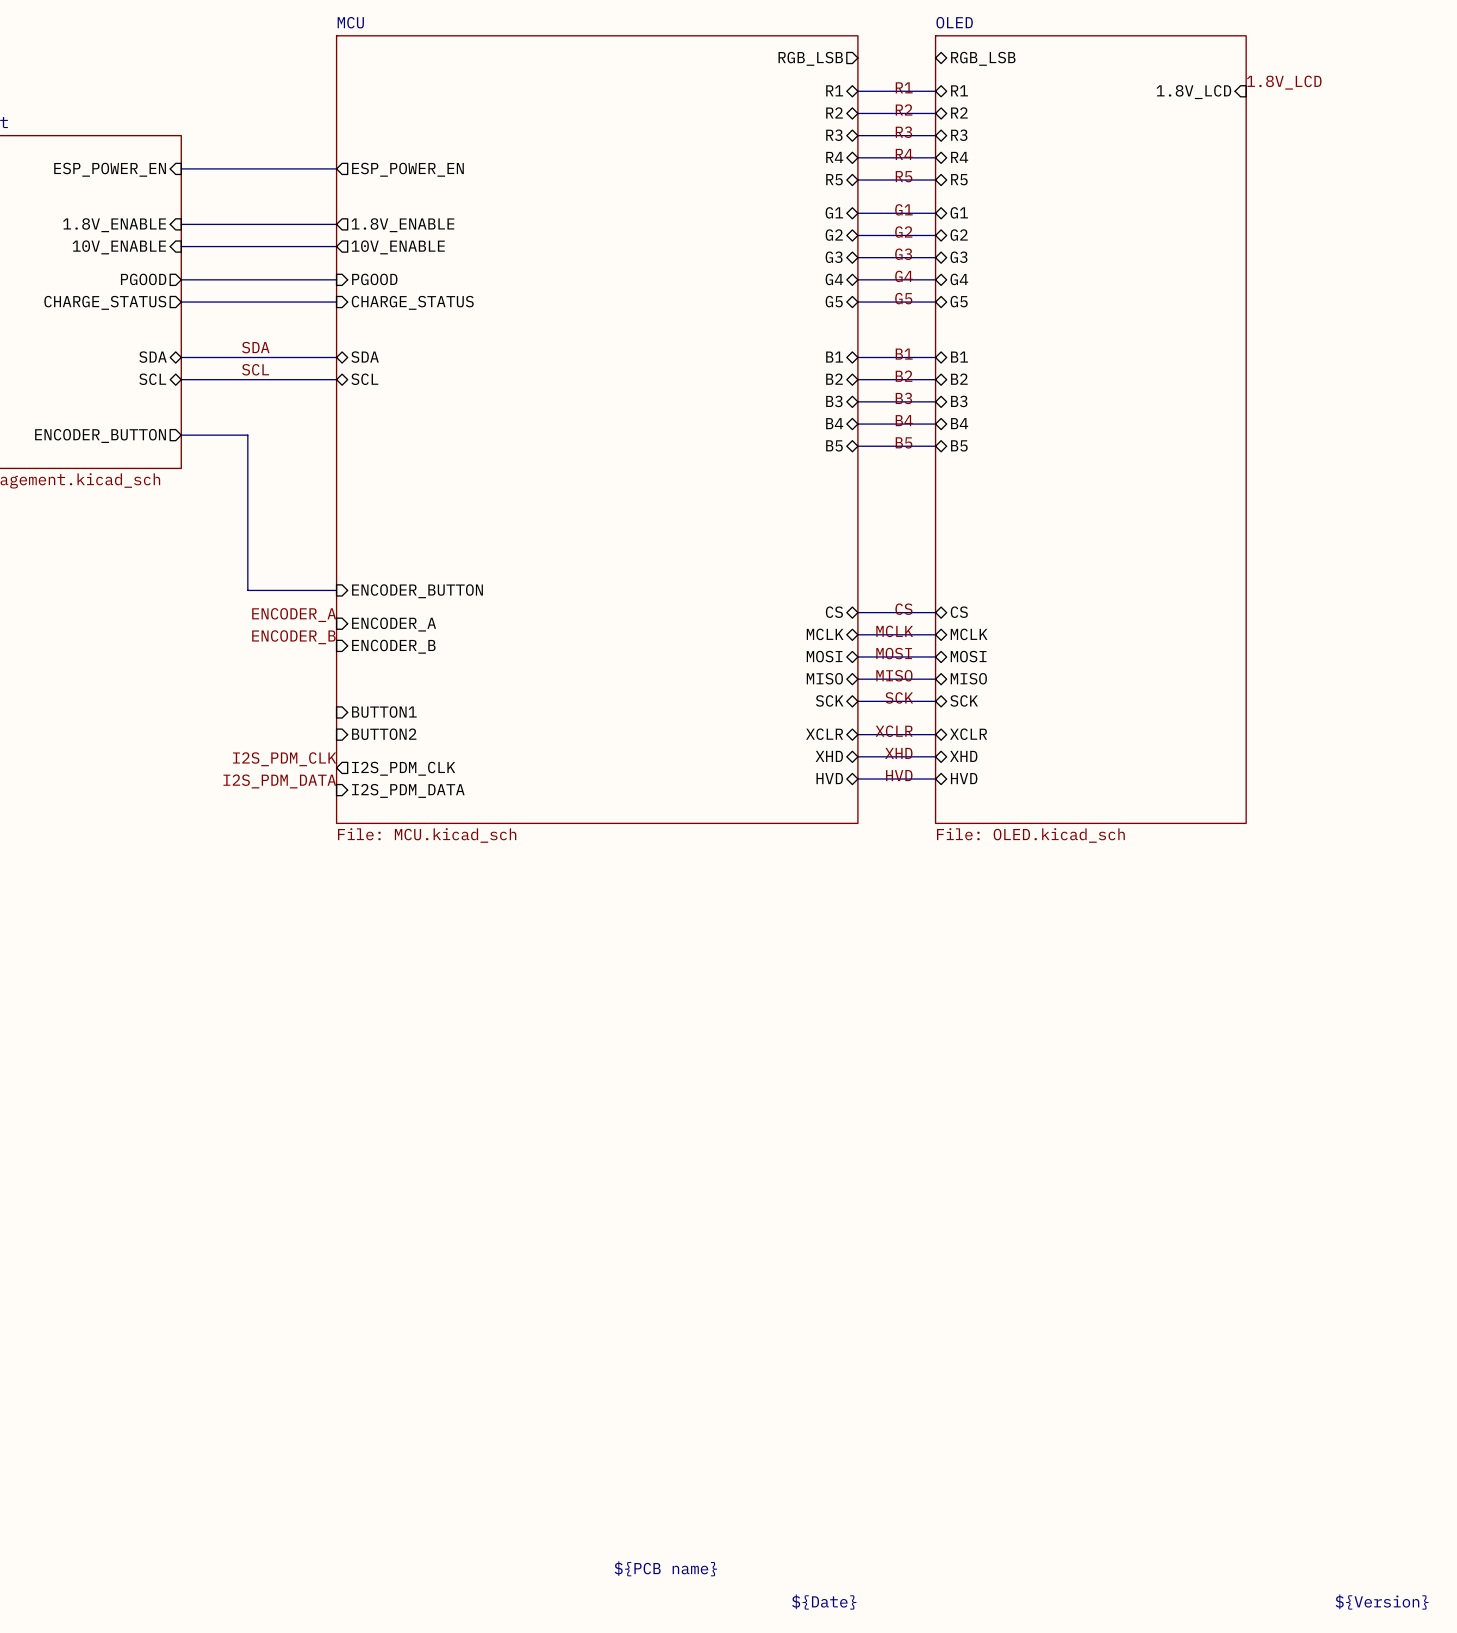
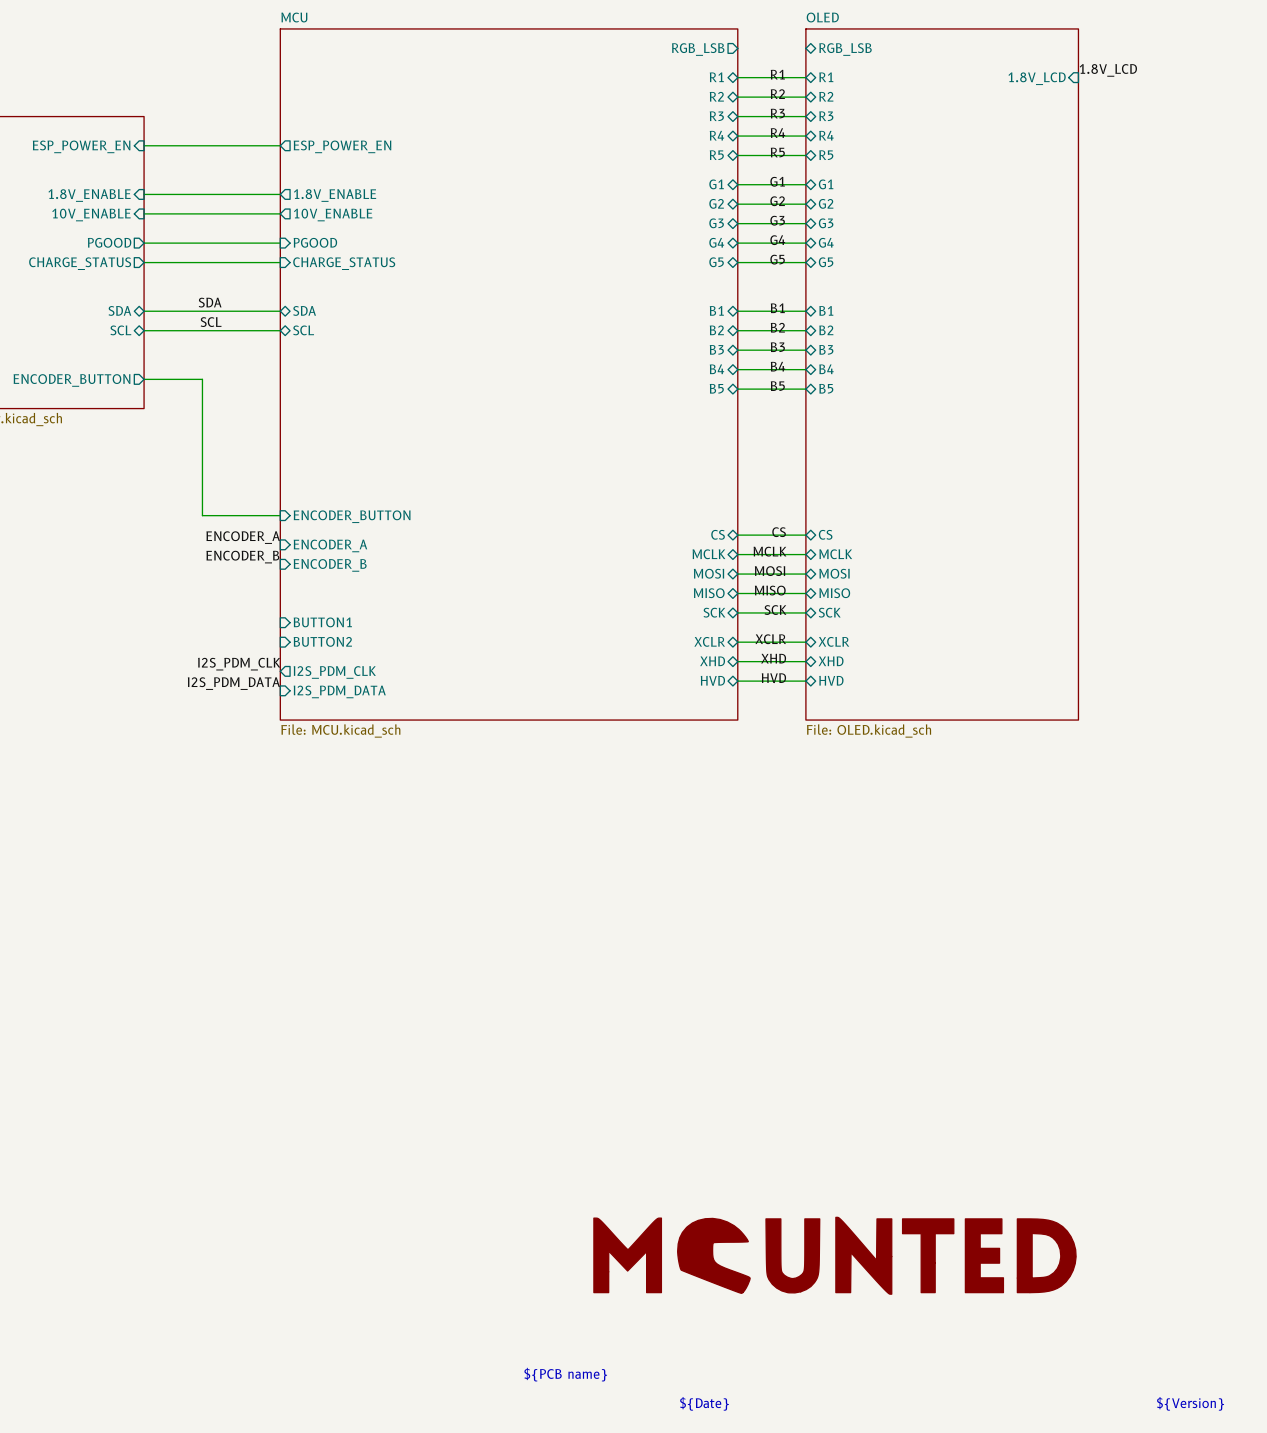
part: none -> (835, 1255)

